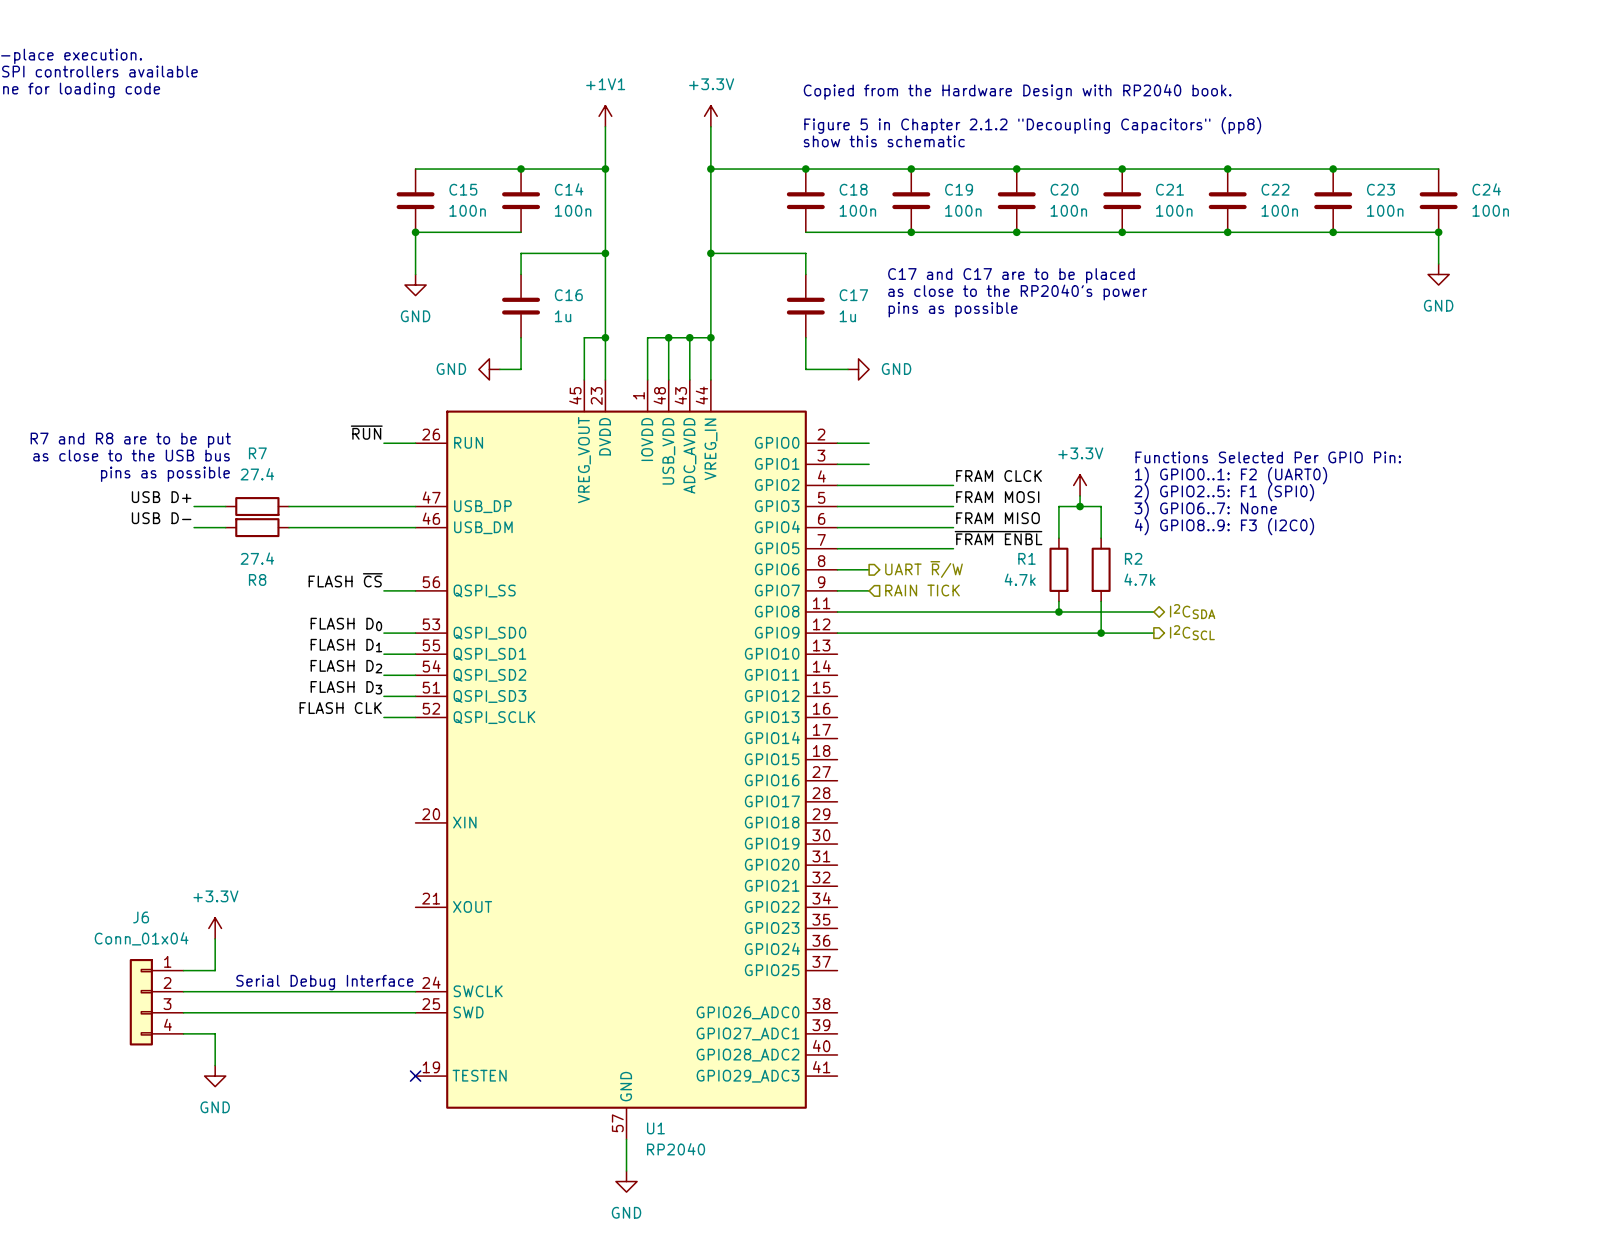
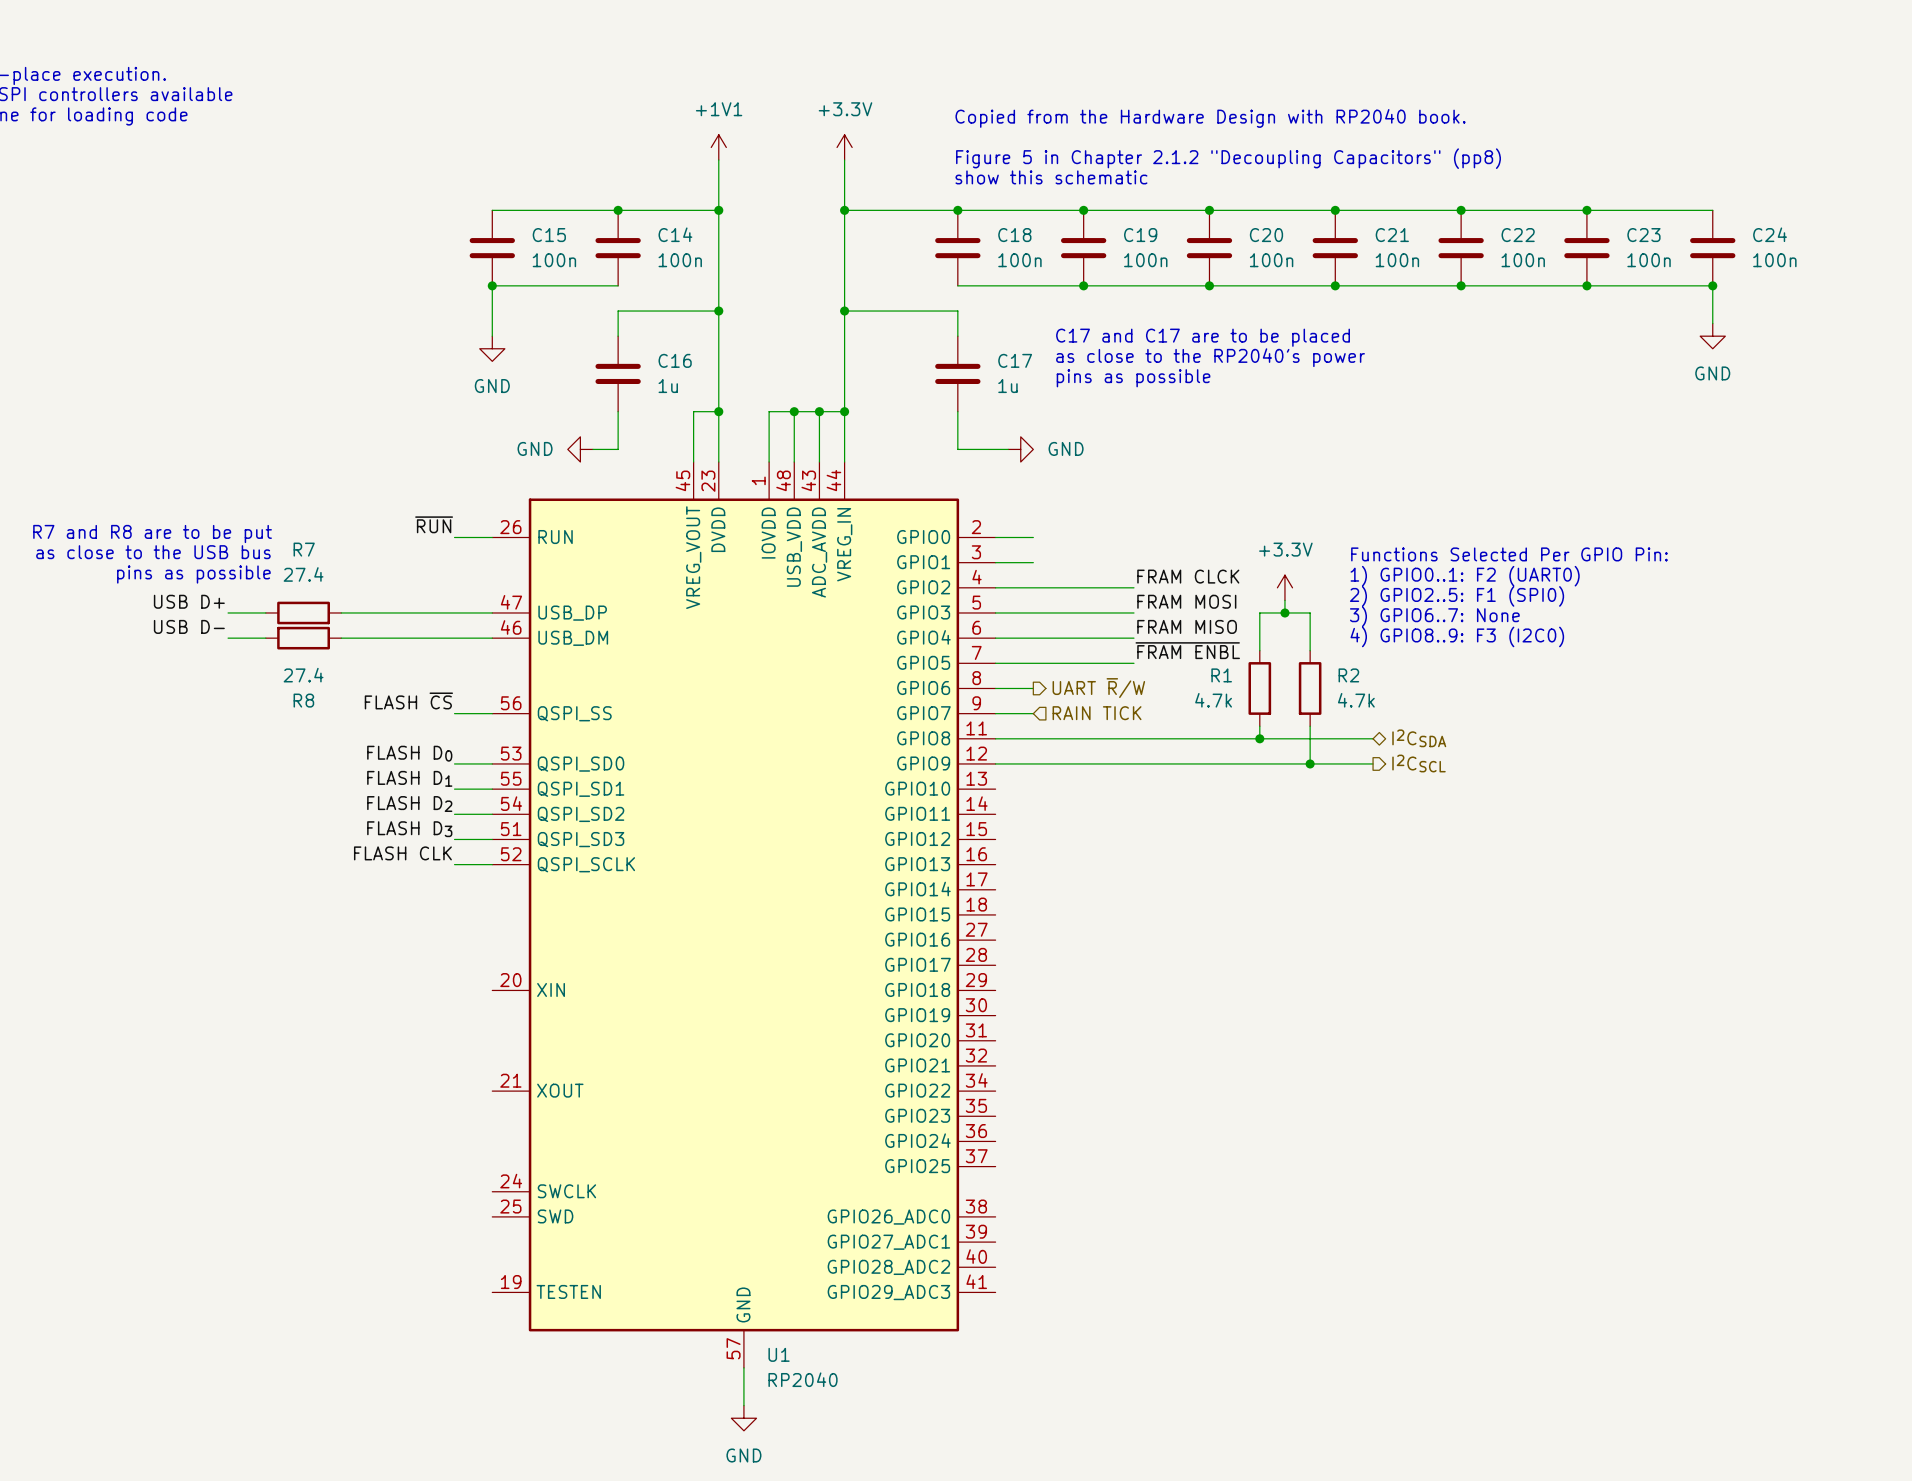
power symbol: +3.3V (215, 928) -> none
wire: (215, 938) (215, 970) (183, 970) -> none
text: Serial Debug Interface (324, 982) -> none
wire: (183, 991) (415, 991) -> none
J6: Conn_01x04 (156, 1002) -> none
wire: (183, 1012) (415, 1012) -> none
wire: (183, 1033) (215, 1033) (215, 1065) -> none
power symbol: GND (215, 1076) -> none
no-connect mark: (415, 1076) -> none

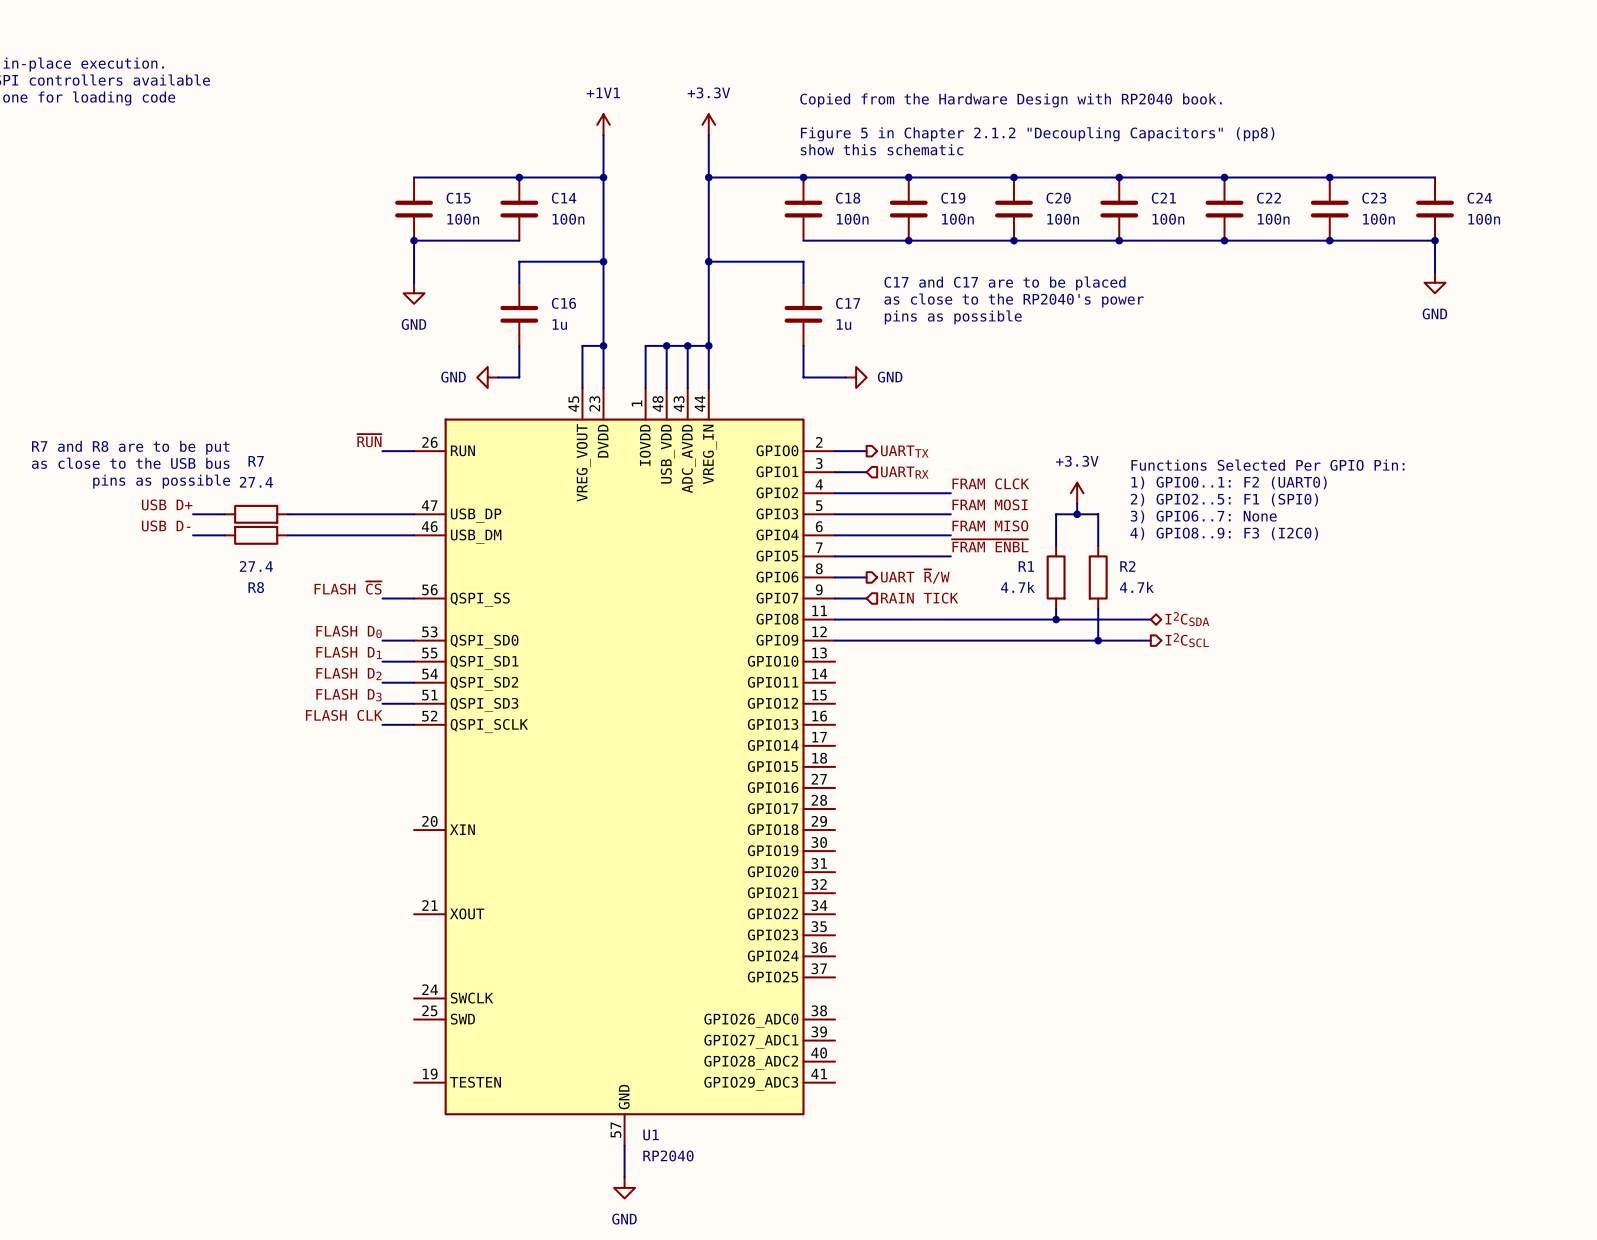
hierarchical label: none -> UARTTX (904, 451)
hierarchical label: none -> UARTRX (904, 472)

